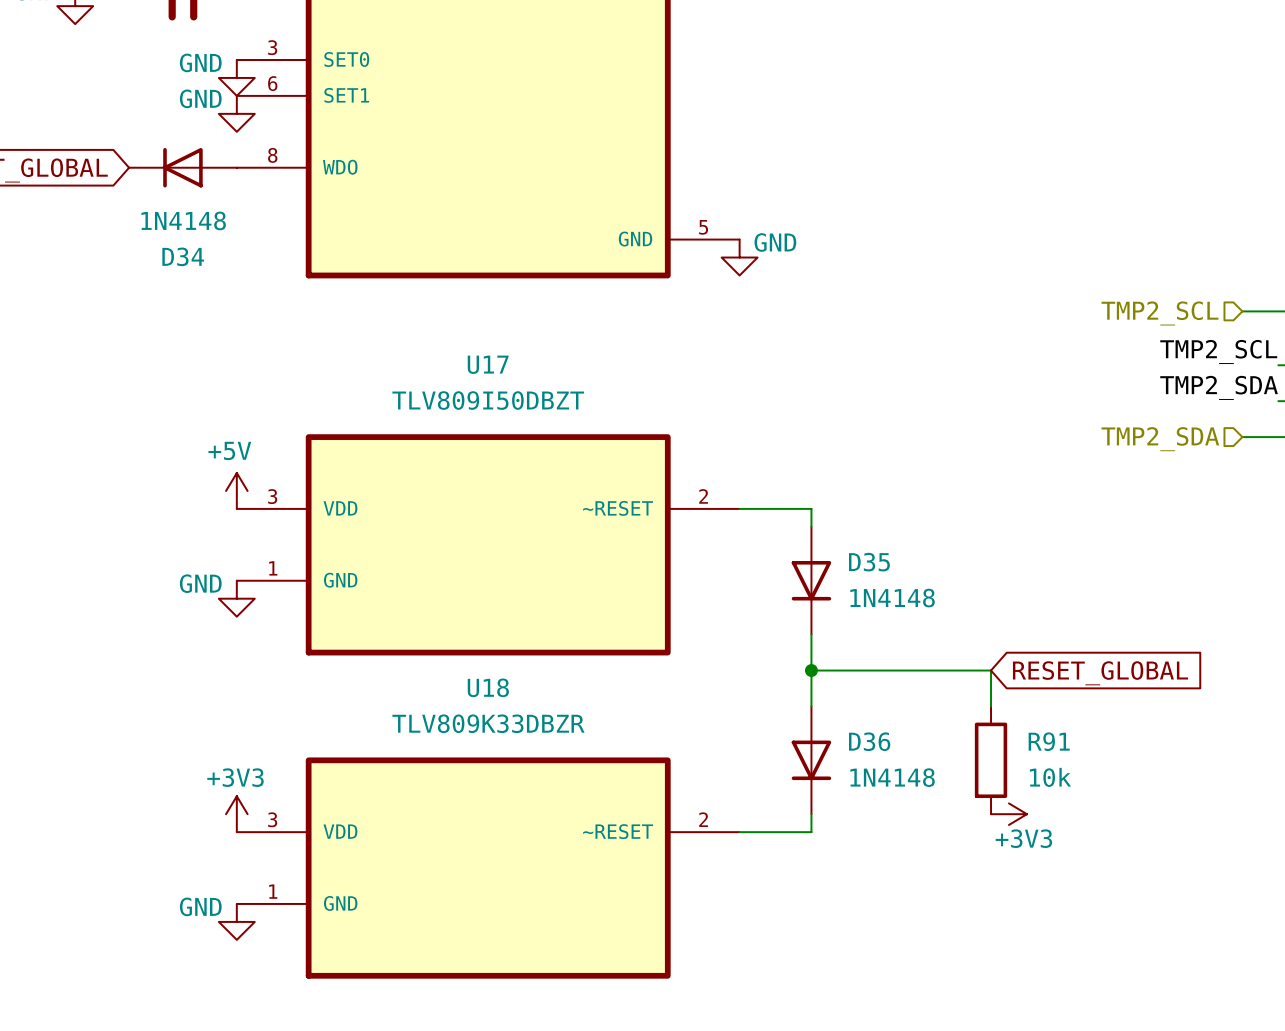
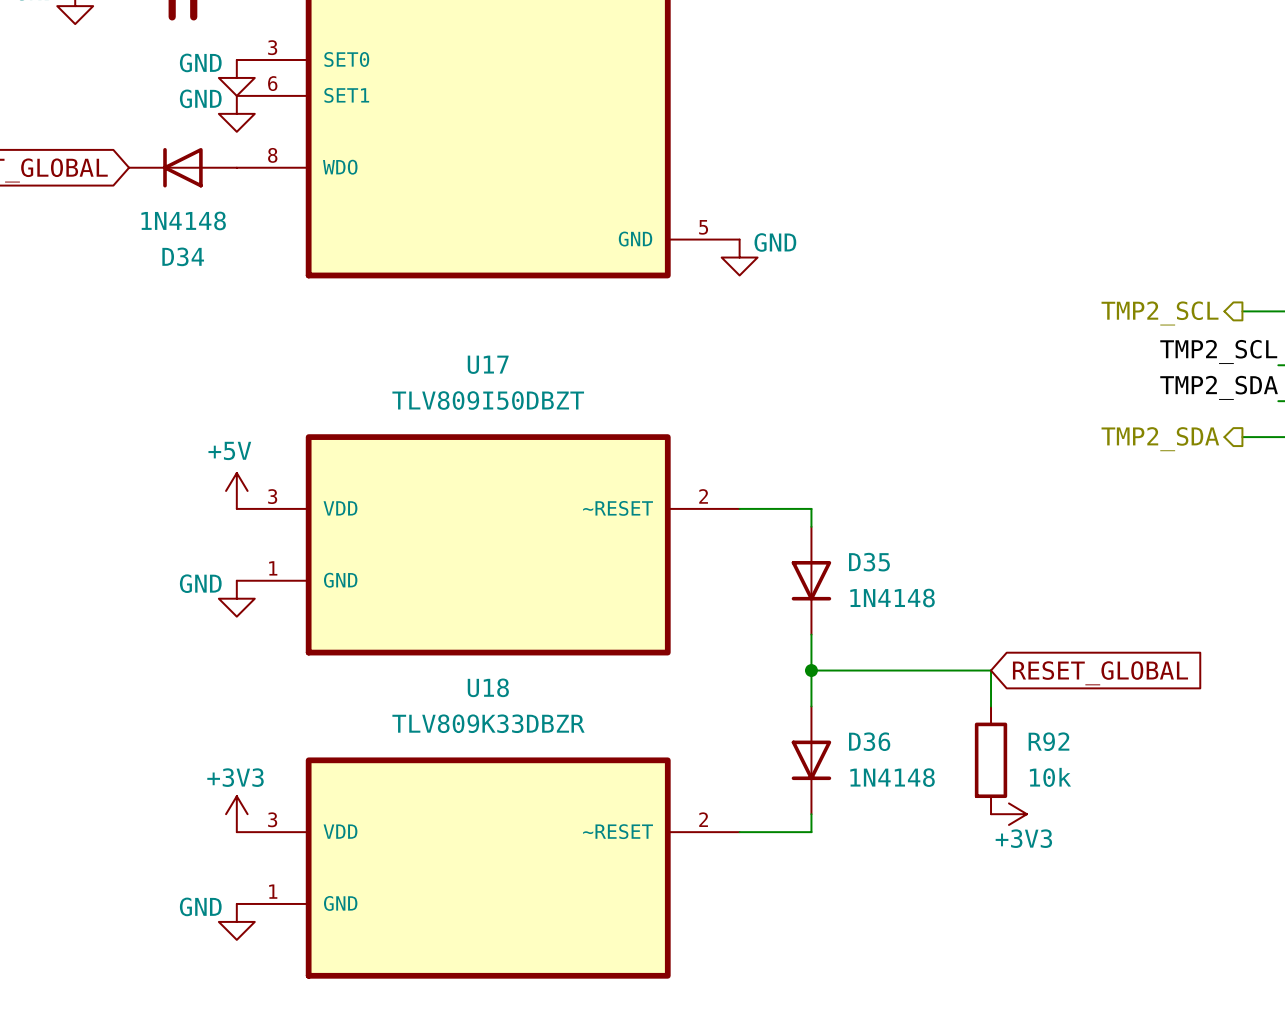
hierarchical label shape: input (1160, 313) -> output (1160, 313)
hierarchical label shape: input (1160, 439) -> output (1160, 439)
R91 name: R91 (1049, 741) -> R92 (1048, 741)

